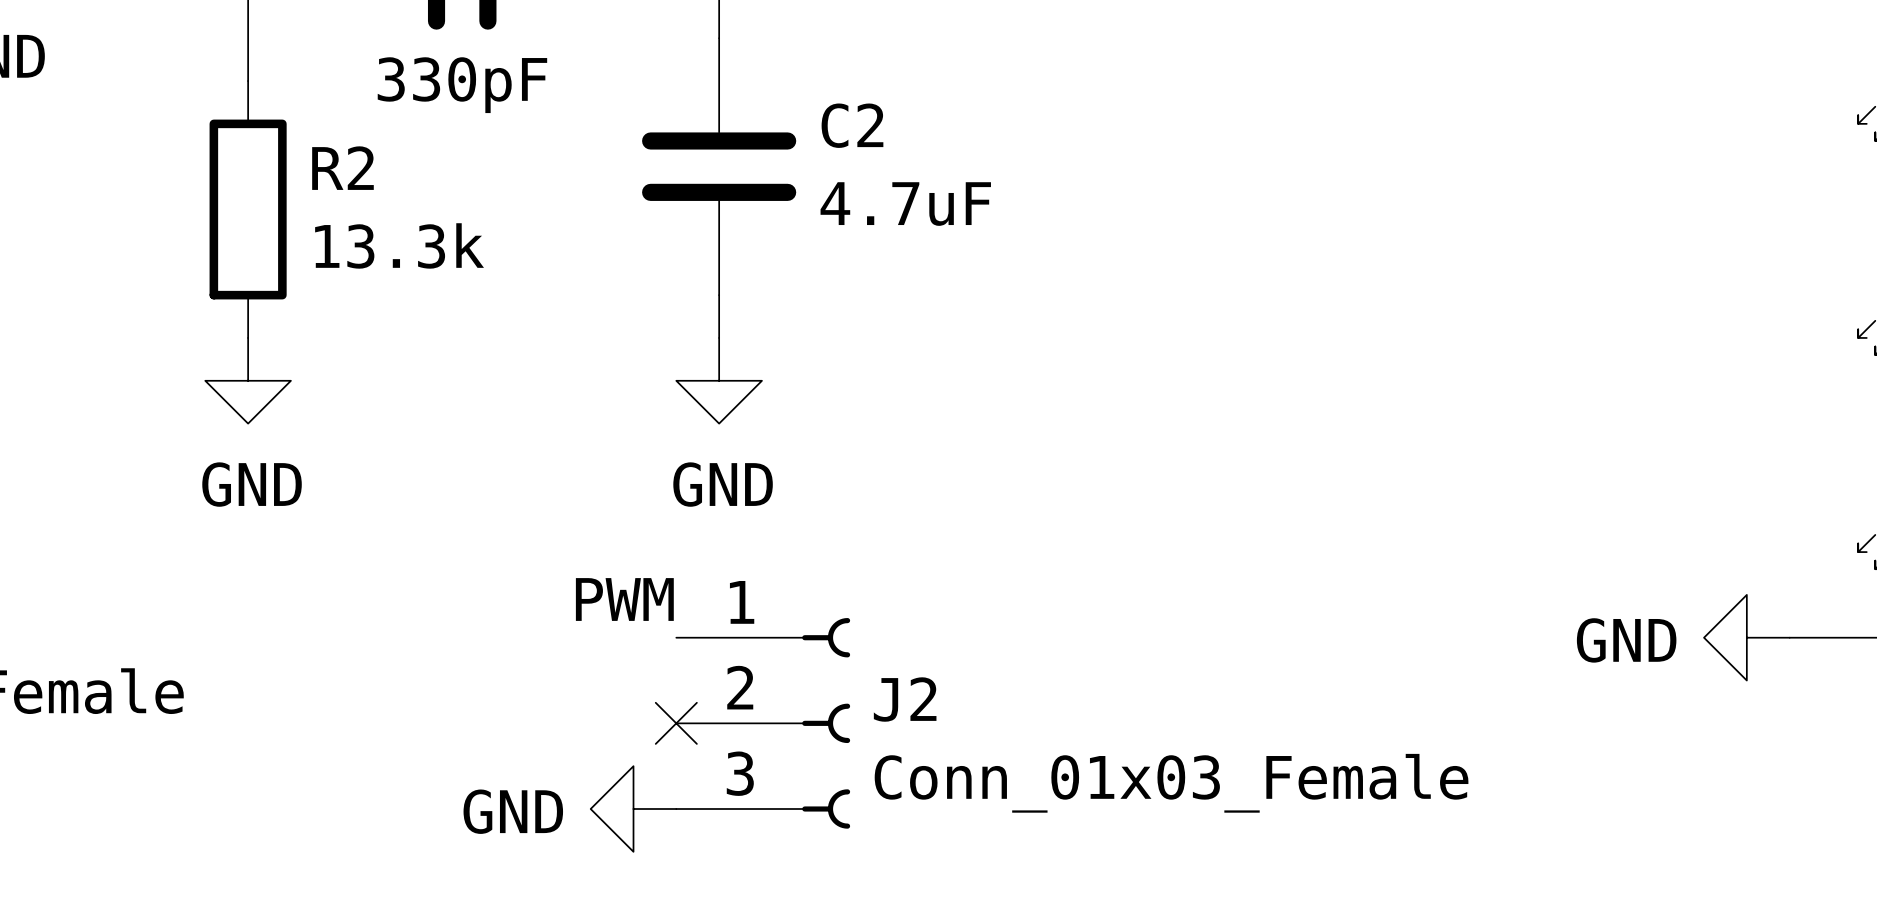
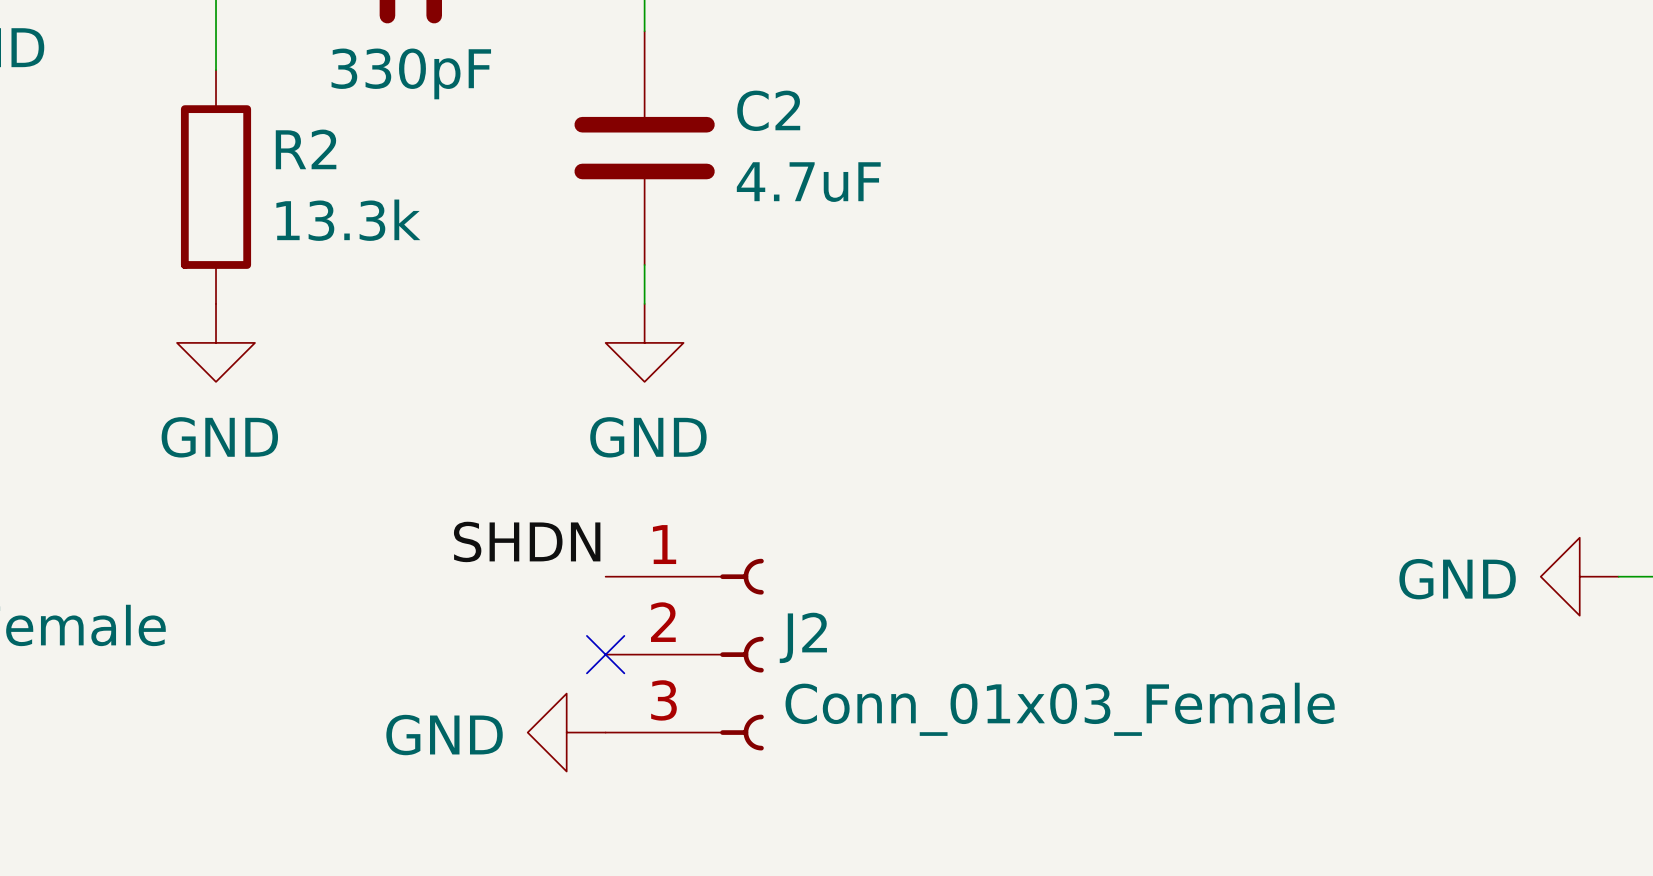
label: PWM (624, 599) -> SHDN (527, 541)

